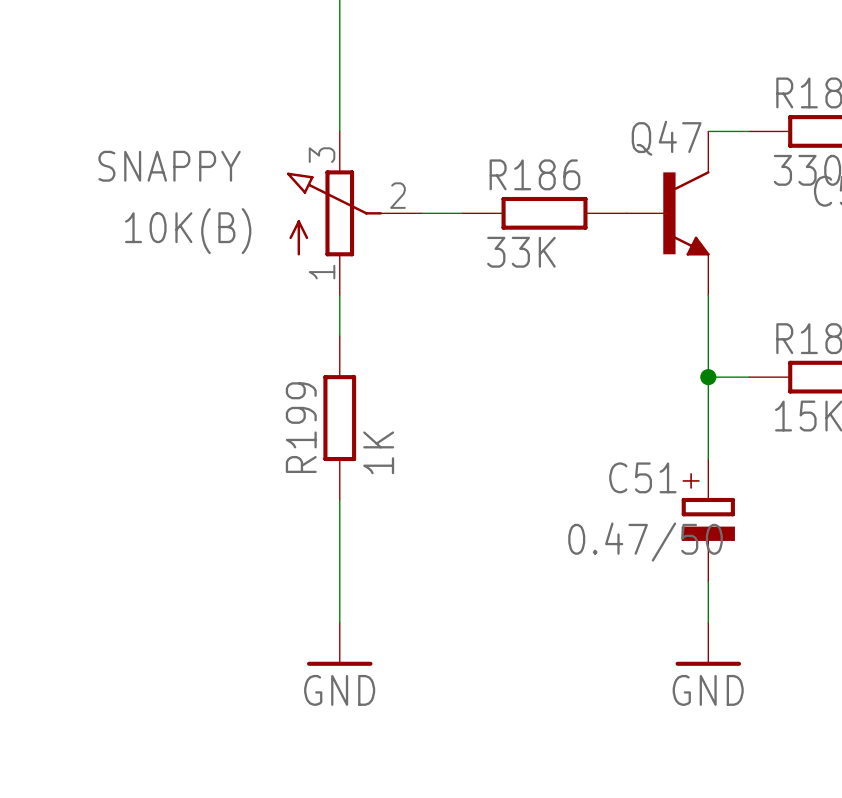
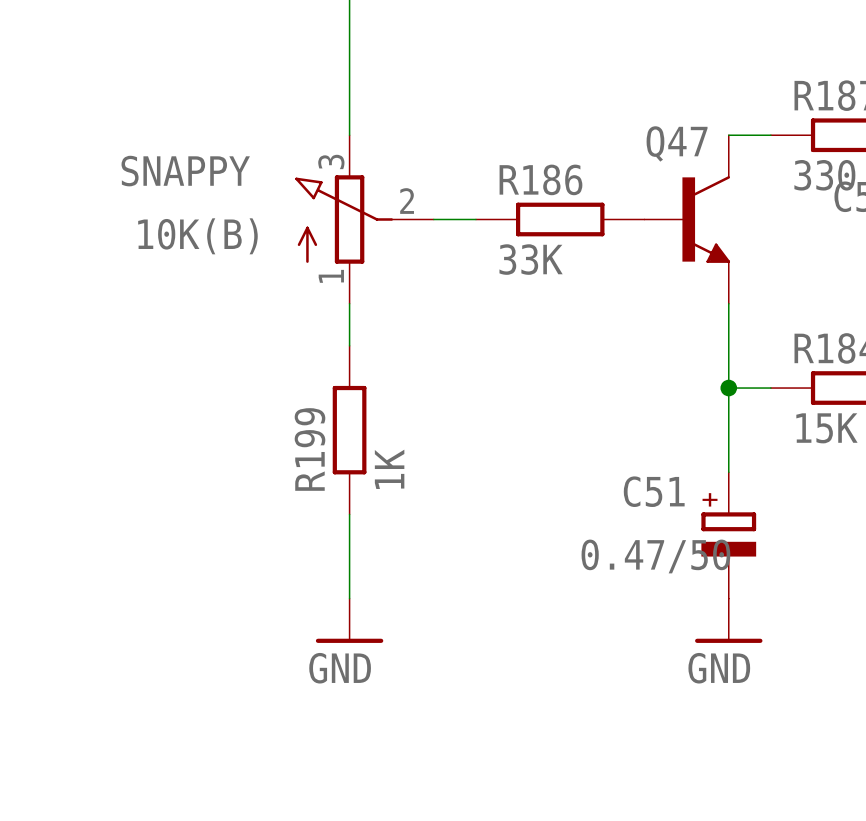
power symbol position: GND (339, 644) -> GND (349, 620)
power symbol position: GND (708, 644) -> GND (728, 620)

